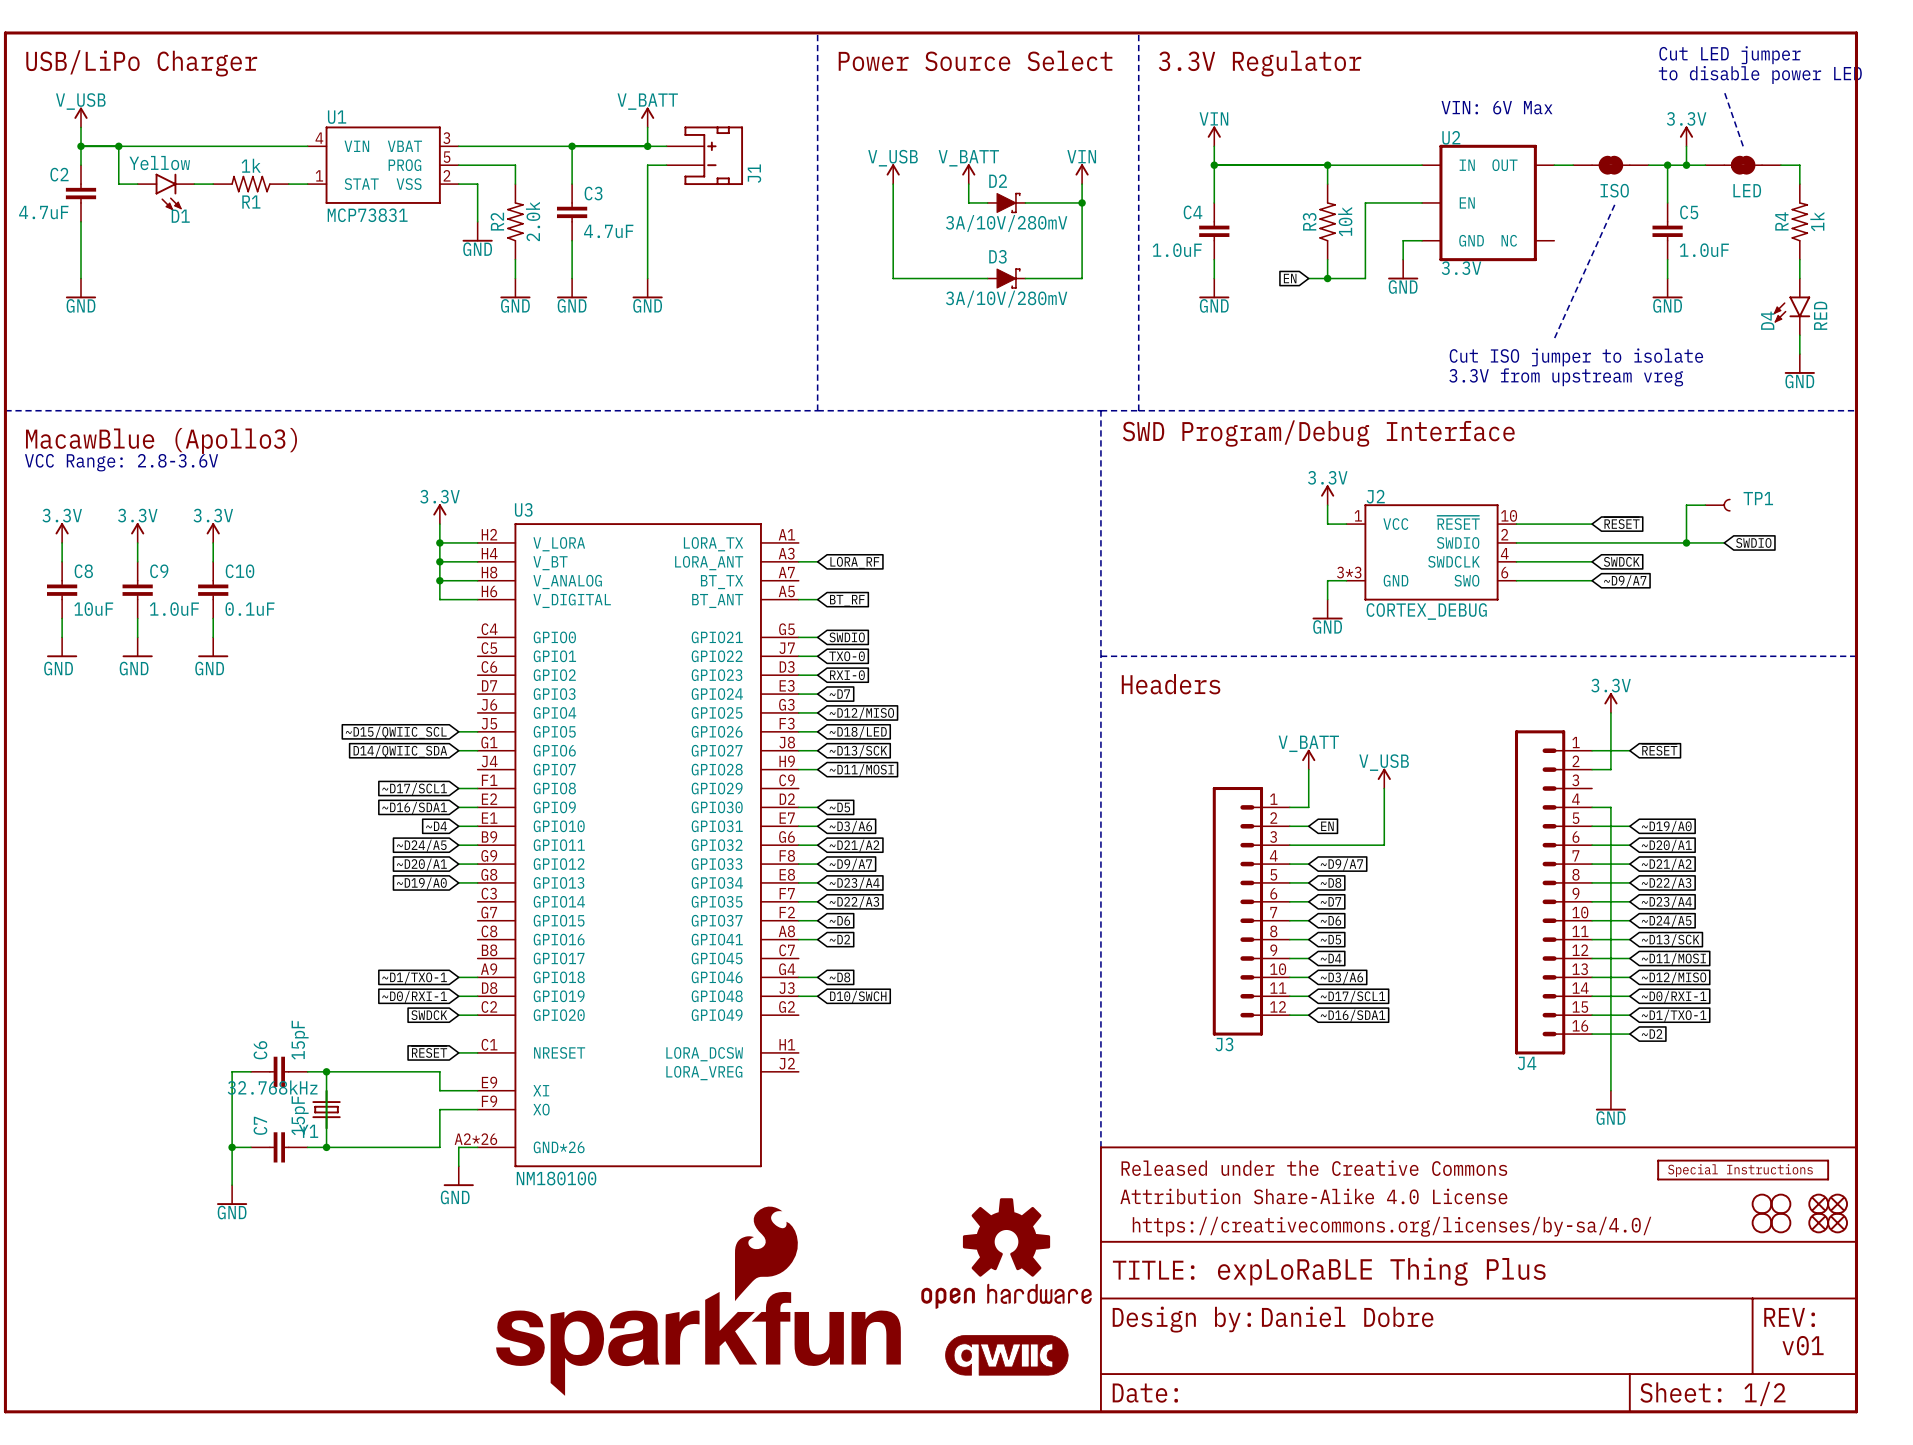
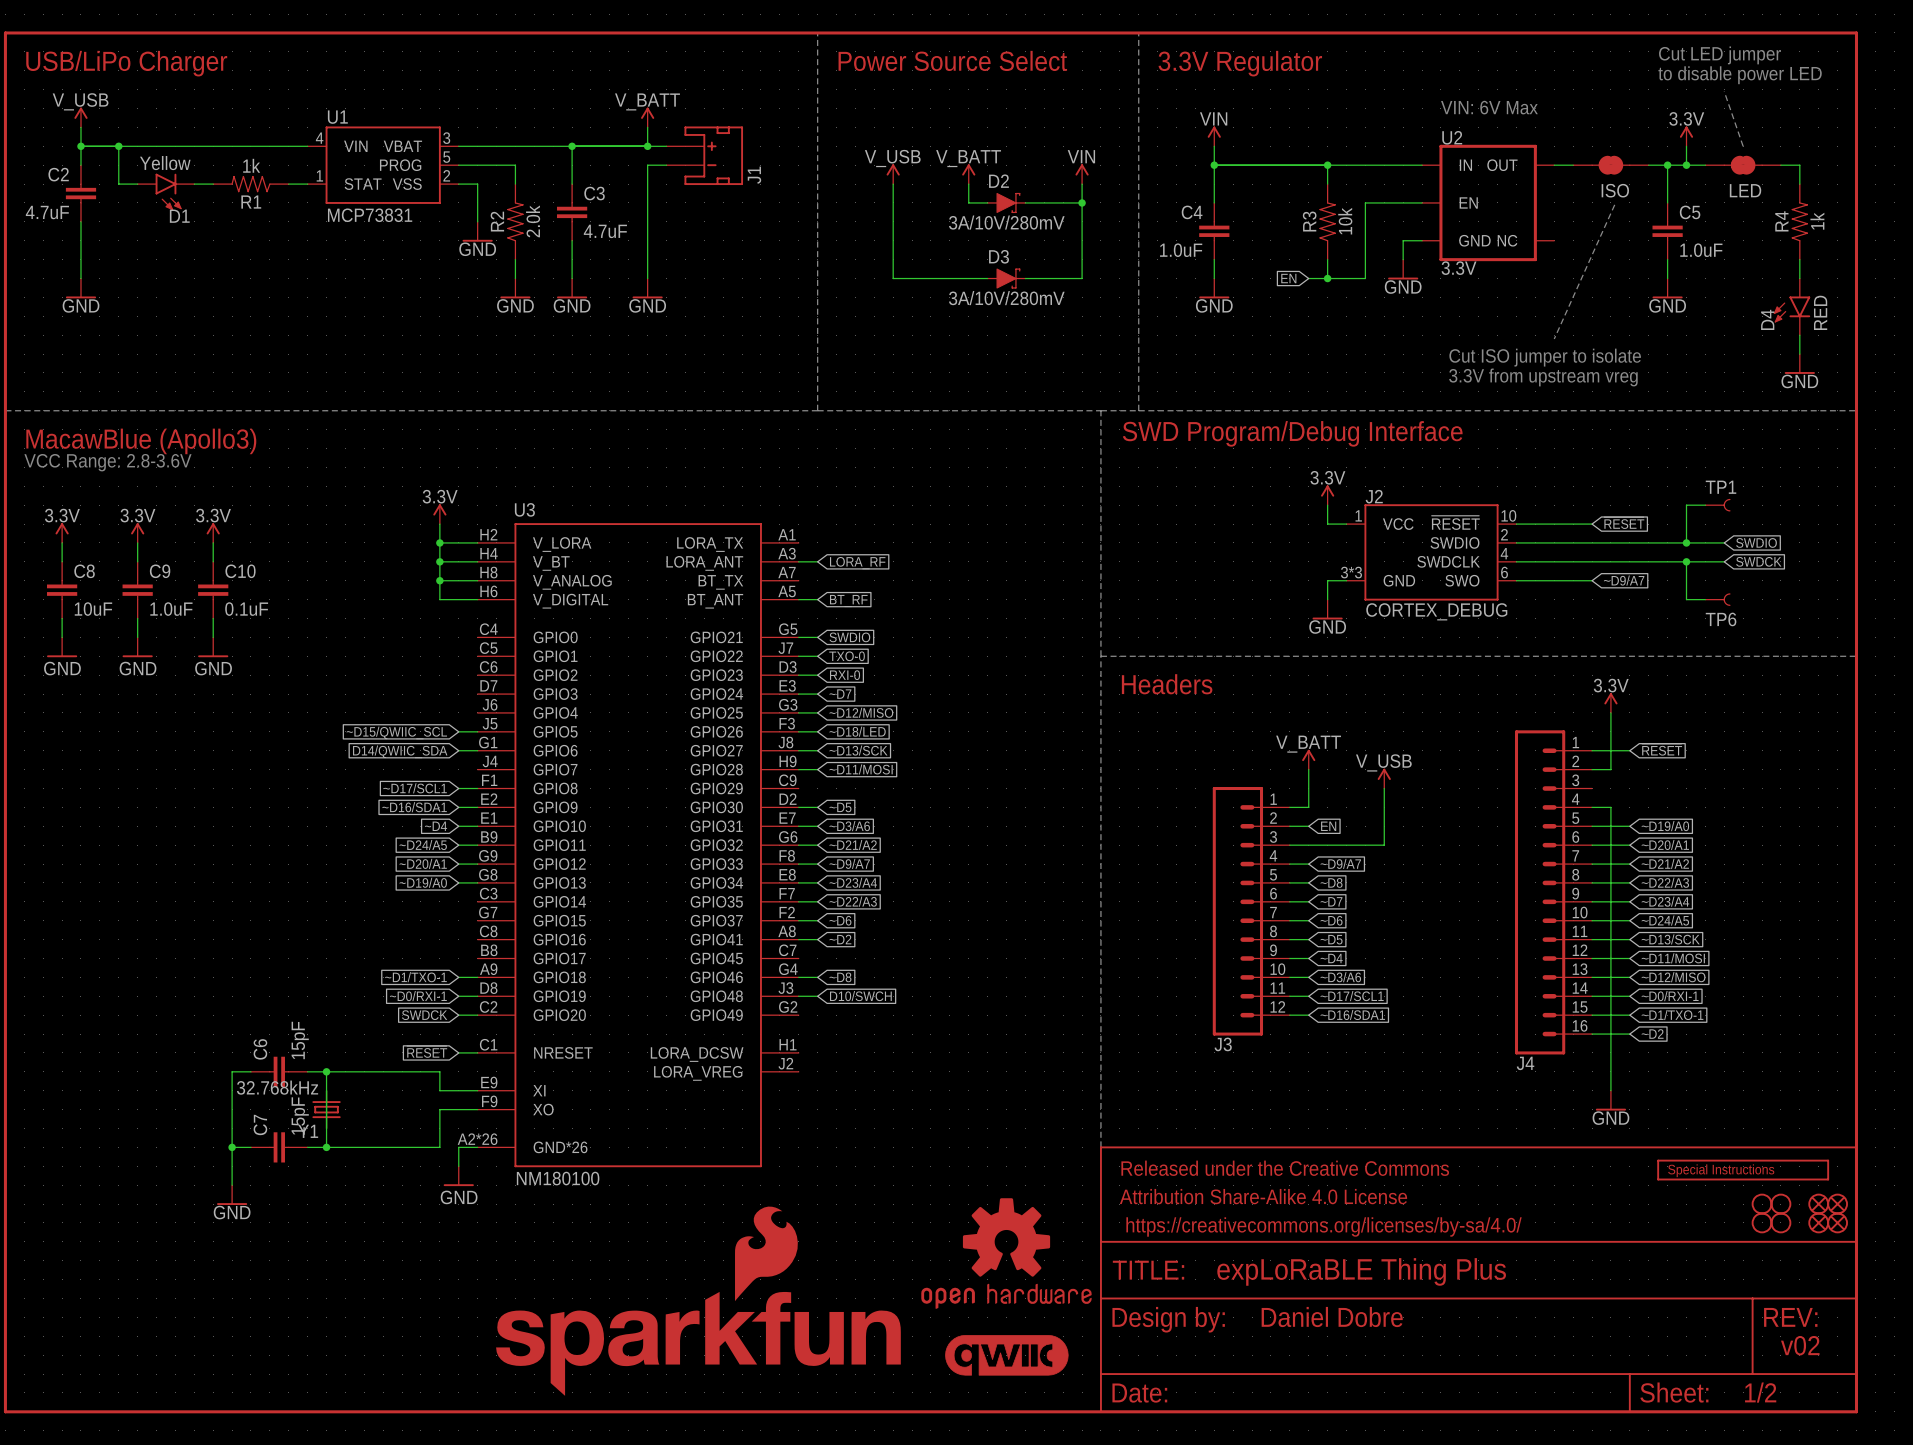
TP1 name position: TP1 (1758, 498) -> TP1 (1721, 487)
wire: none -> (1592, 561) (1724, 561)
global label position: SWDCK (1621, 561) -> SWDCK (1758, 561)
wire: none -> (1686, 561) (1686, 599) (1705, 599)
junction: none -> (1686, 561)
TP6: none -> (1717, 599)
text: v01 (1803, 1345) -> v02 (1800, 1345)

